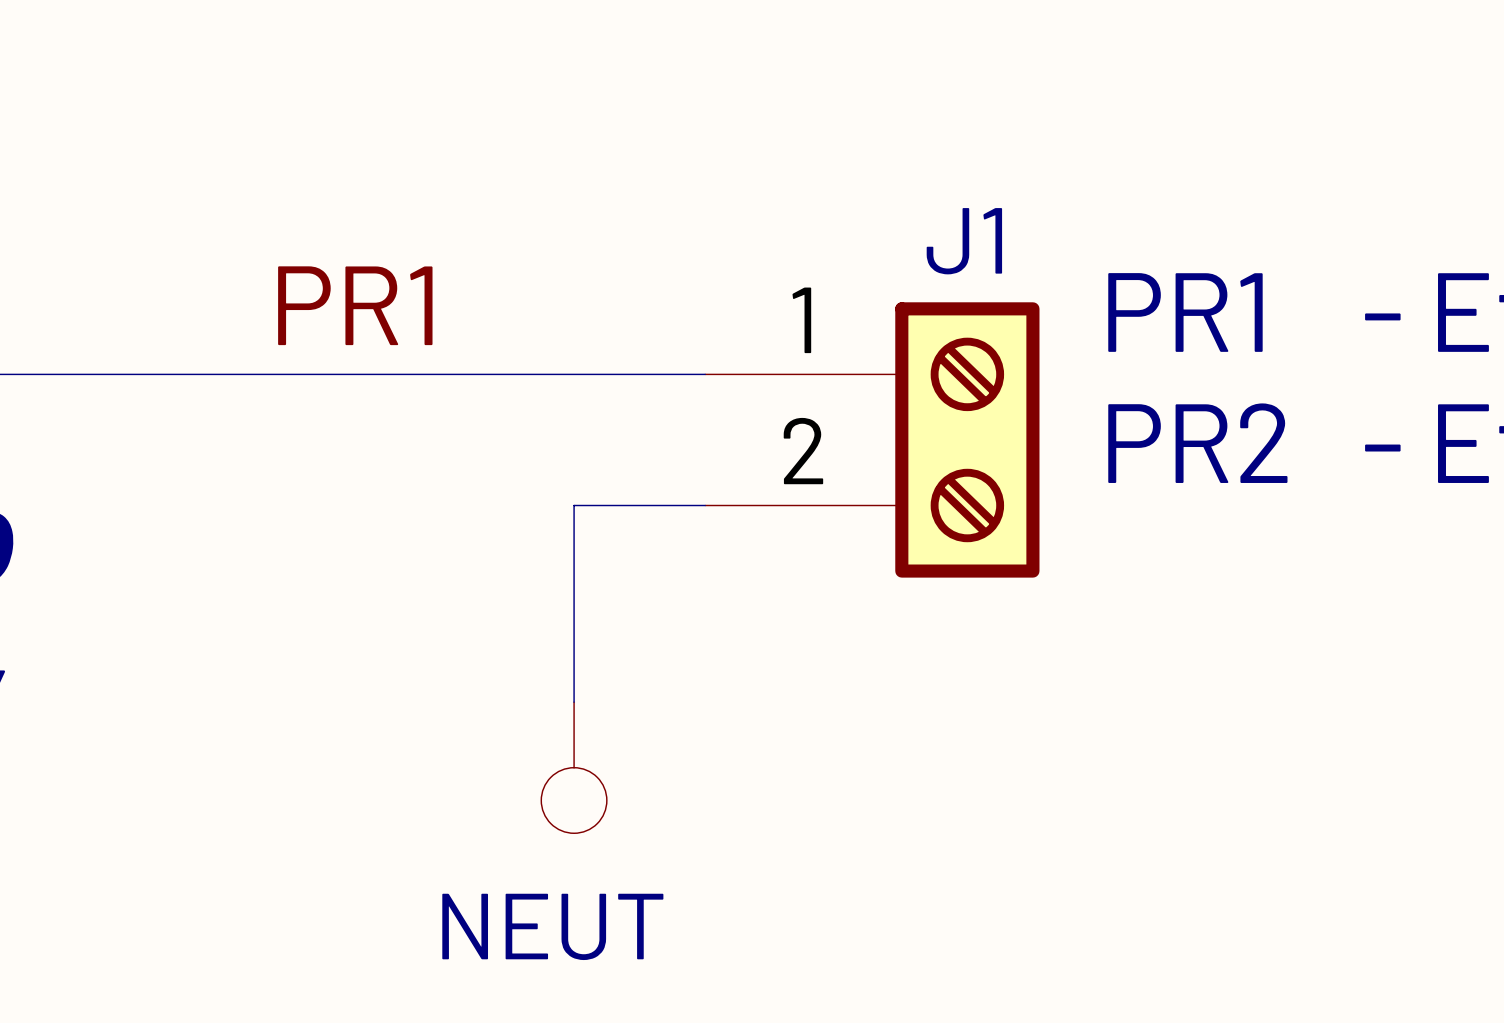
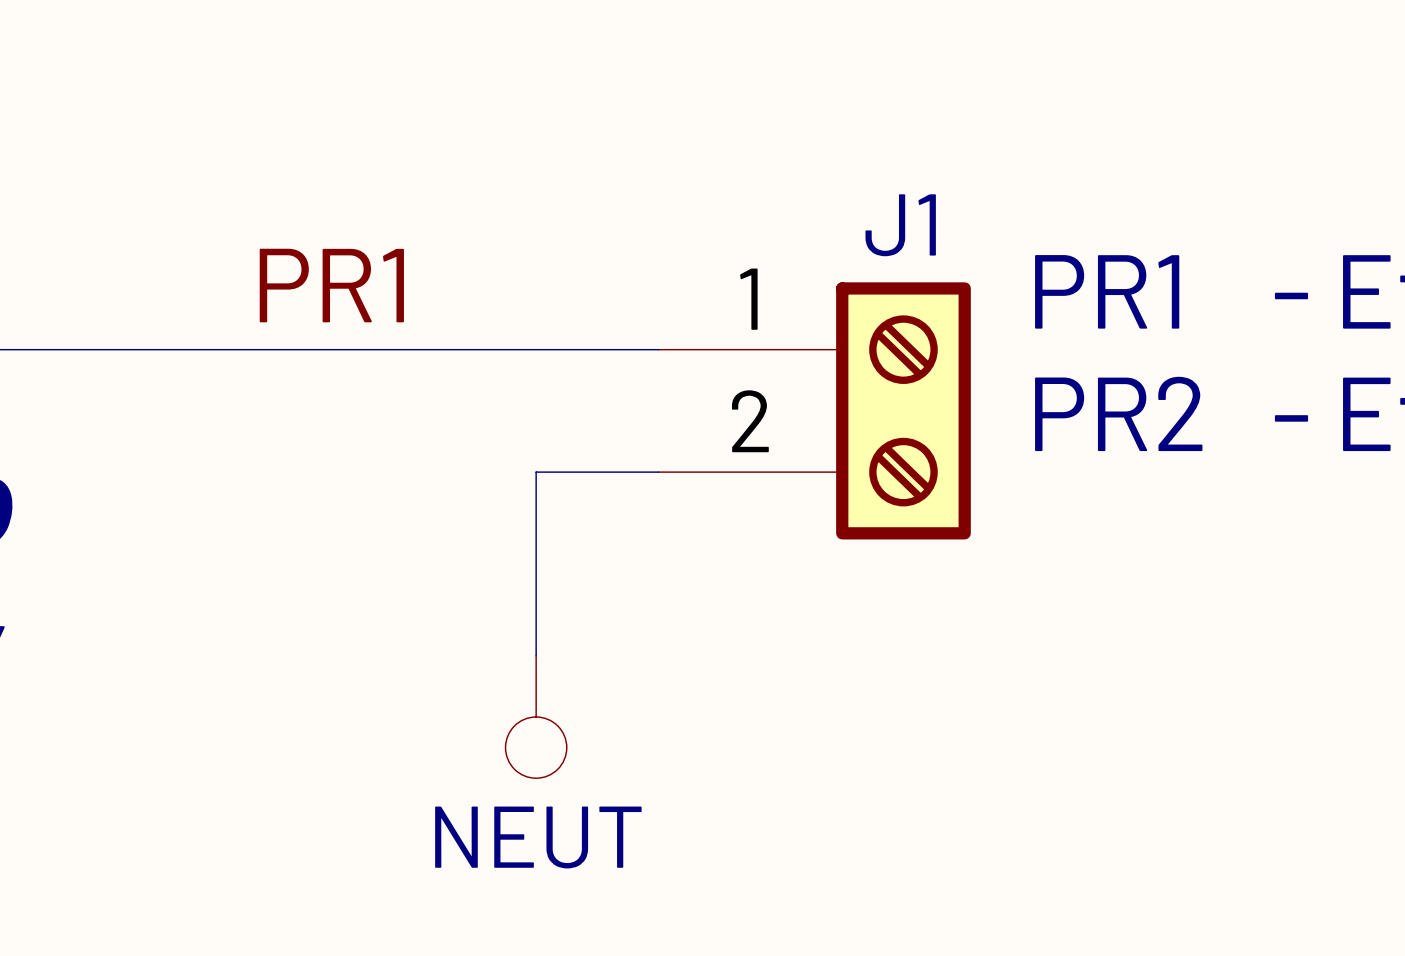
power symbol text position: NEUT (552, 926) -> NEUT (538, 837)

